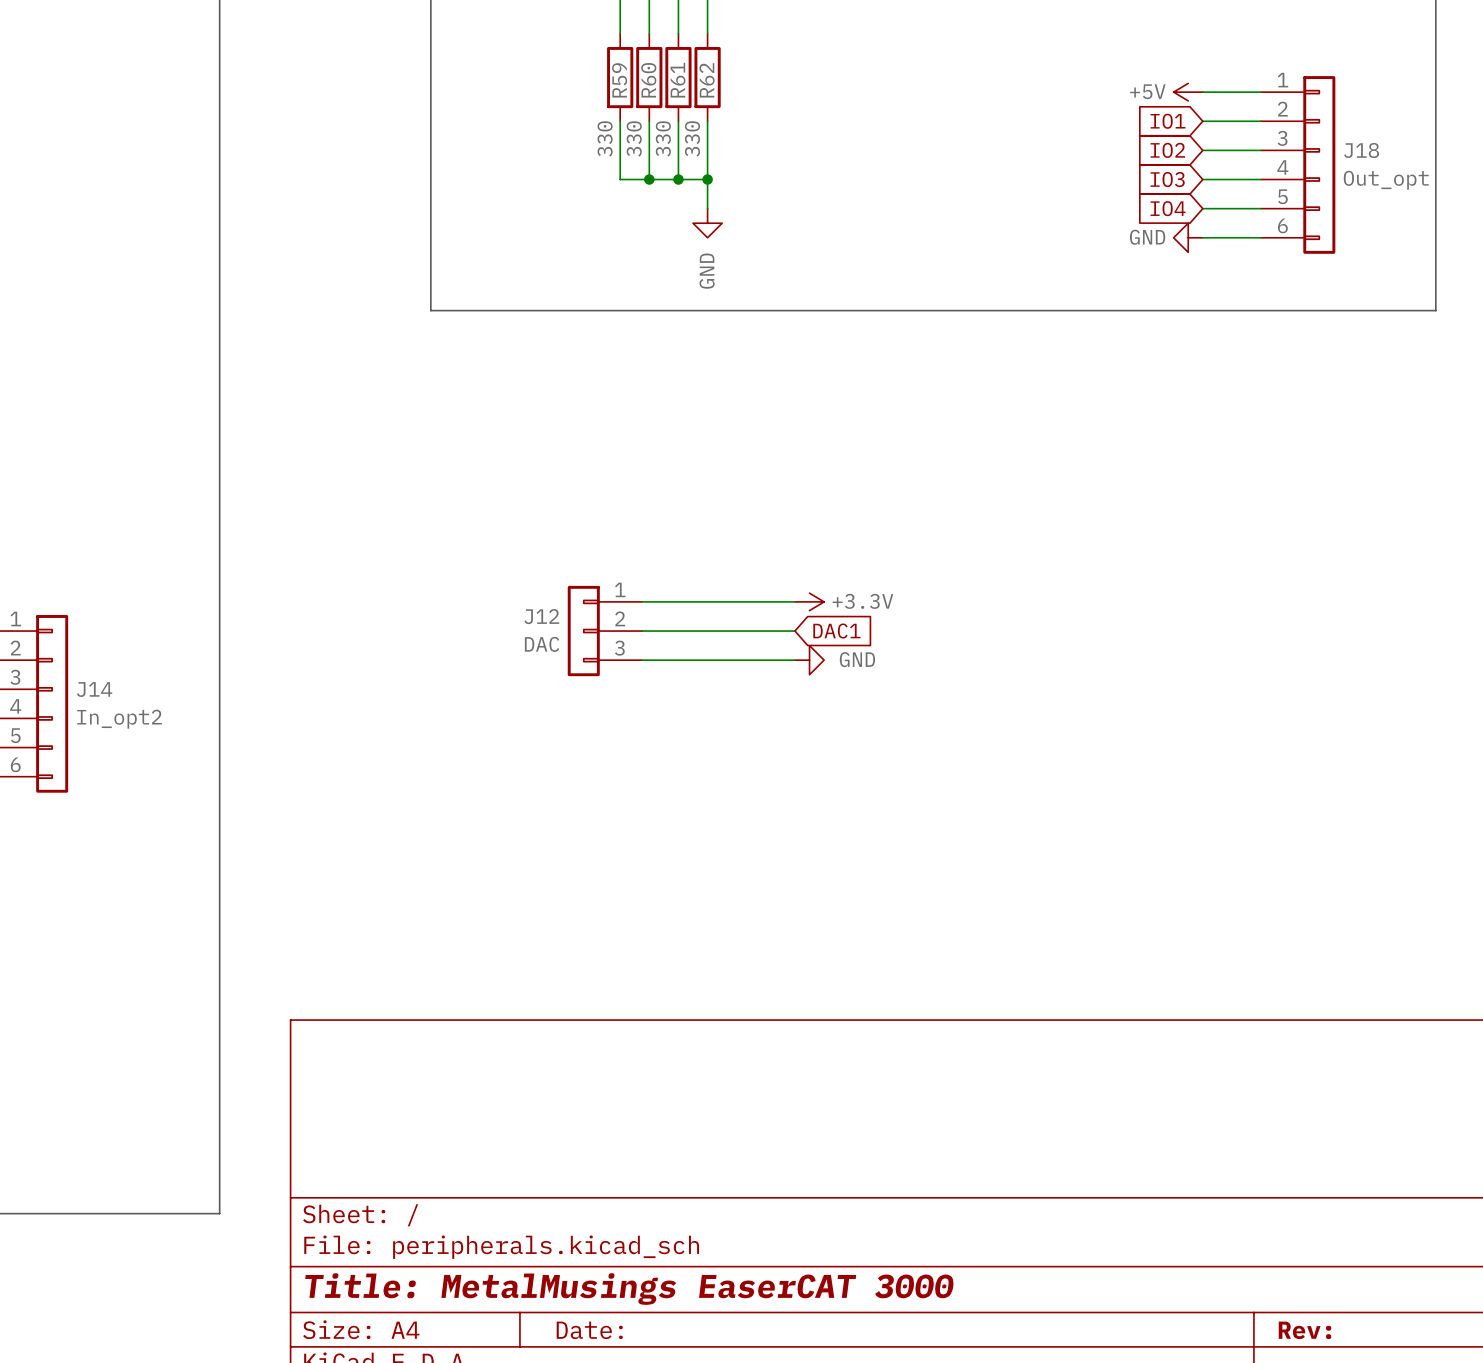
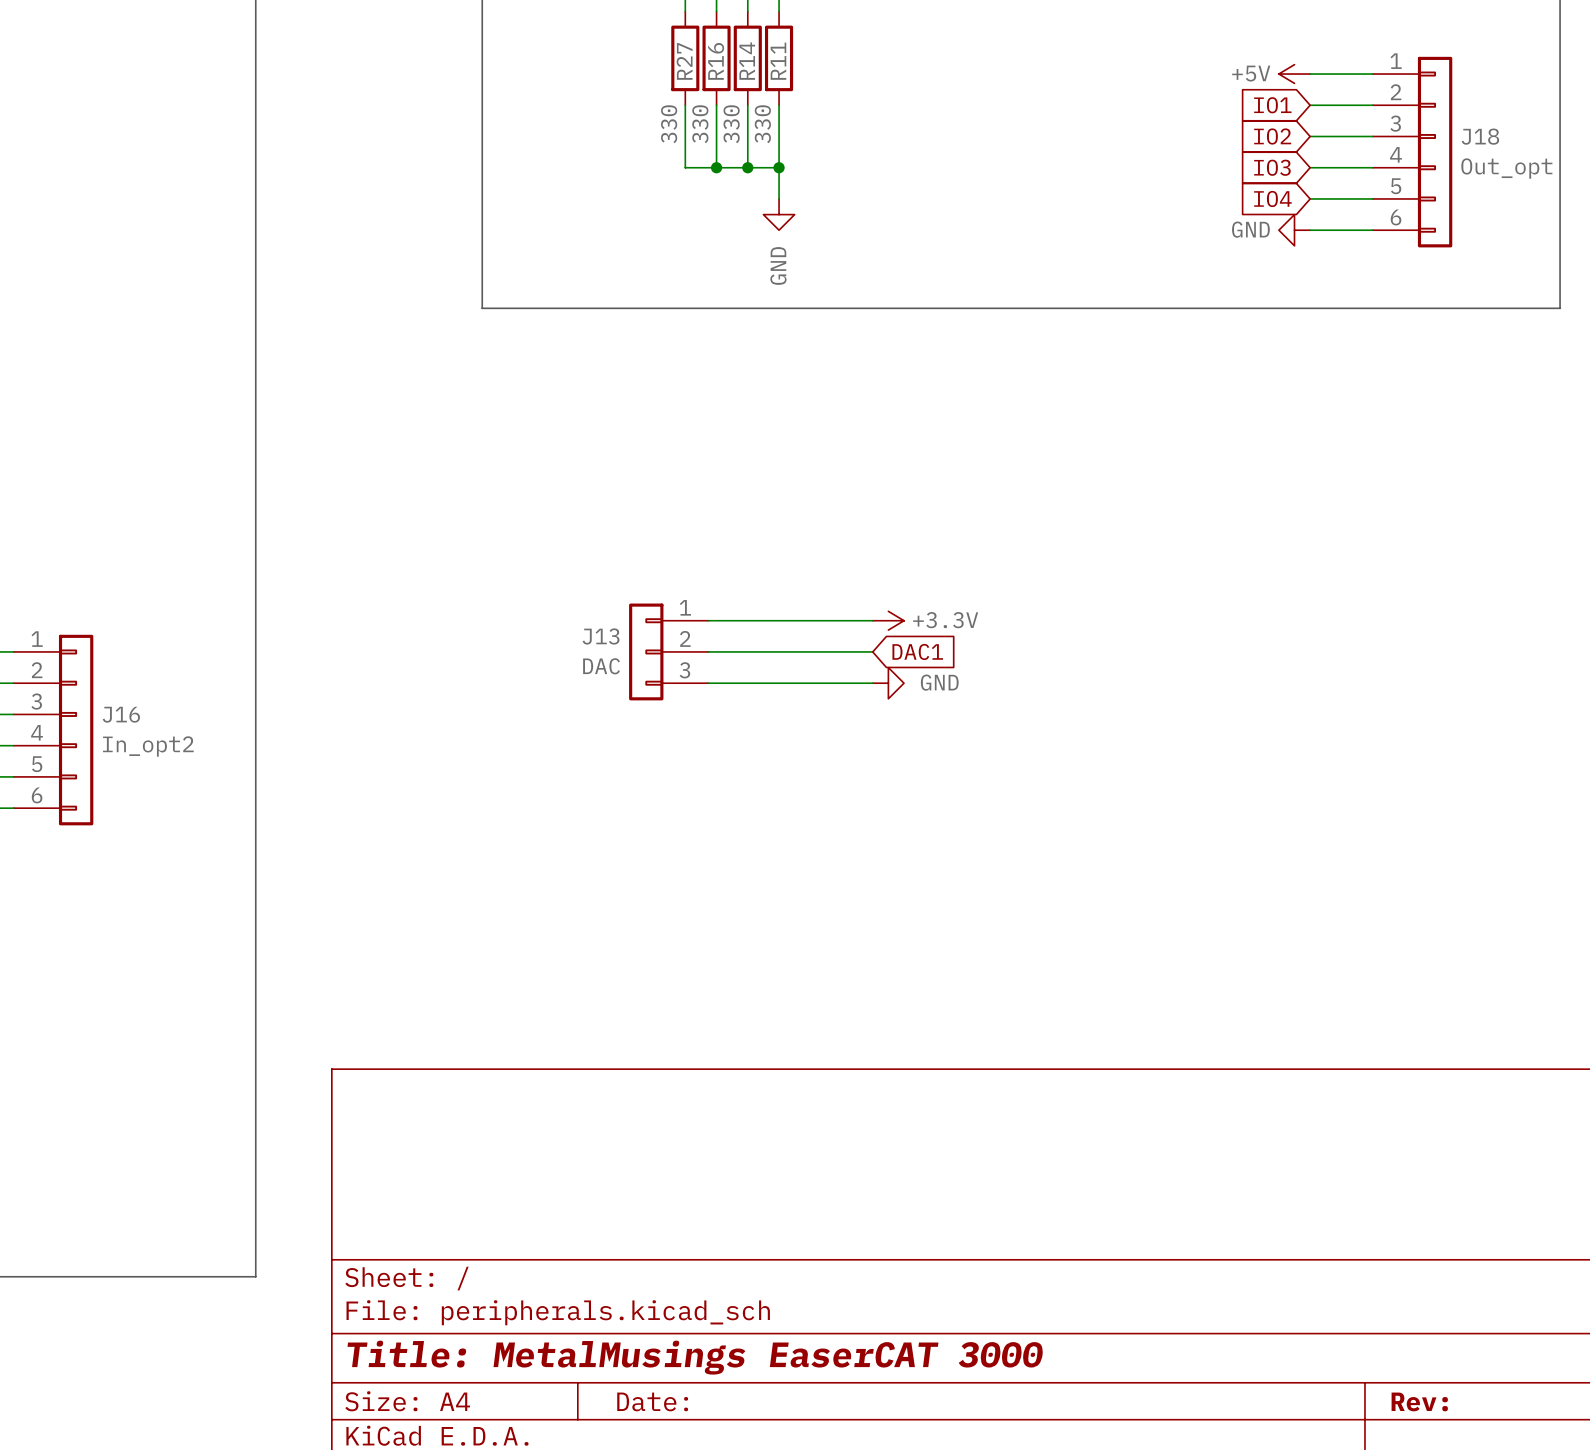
R59 name: R59 (619, 80) -> R27 (684, 61)
R60 name: R60 (648, 80) -> R16 (716, 61)
R61 name: R61 (678, 80) -> R14 (747, 61)
R62 name: R62 (707, 80) -> R11 (778, 61)
J12 name: J12 (541, 616) -> J13 (601, 636)
J14 name: J14 (94, 689) -> J16 (121, 714)

